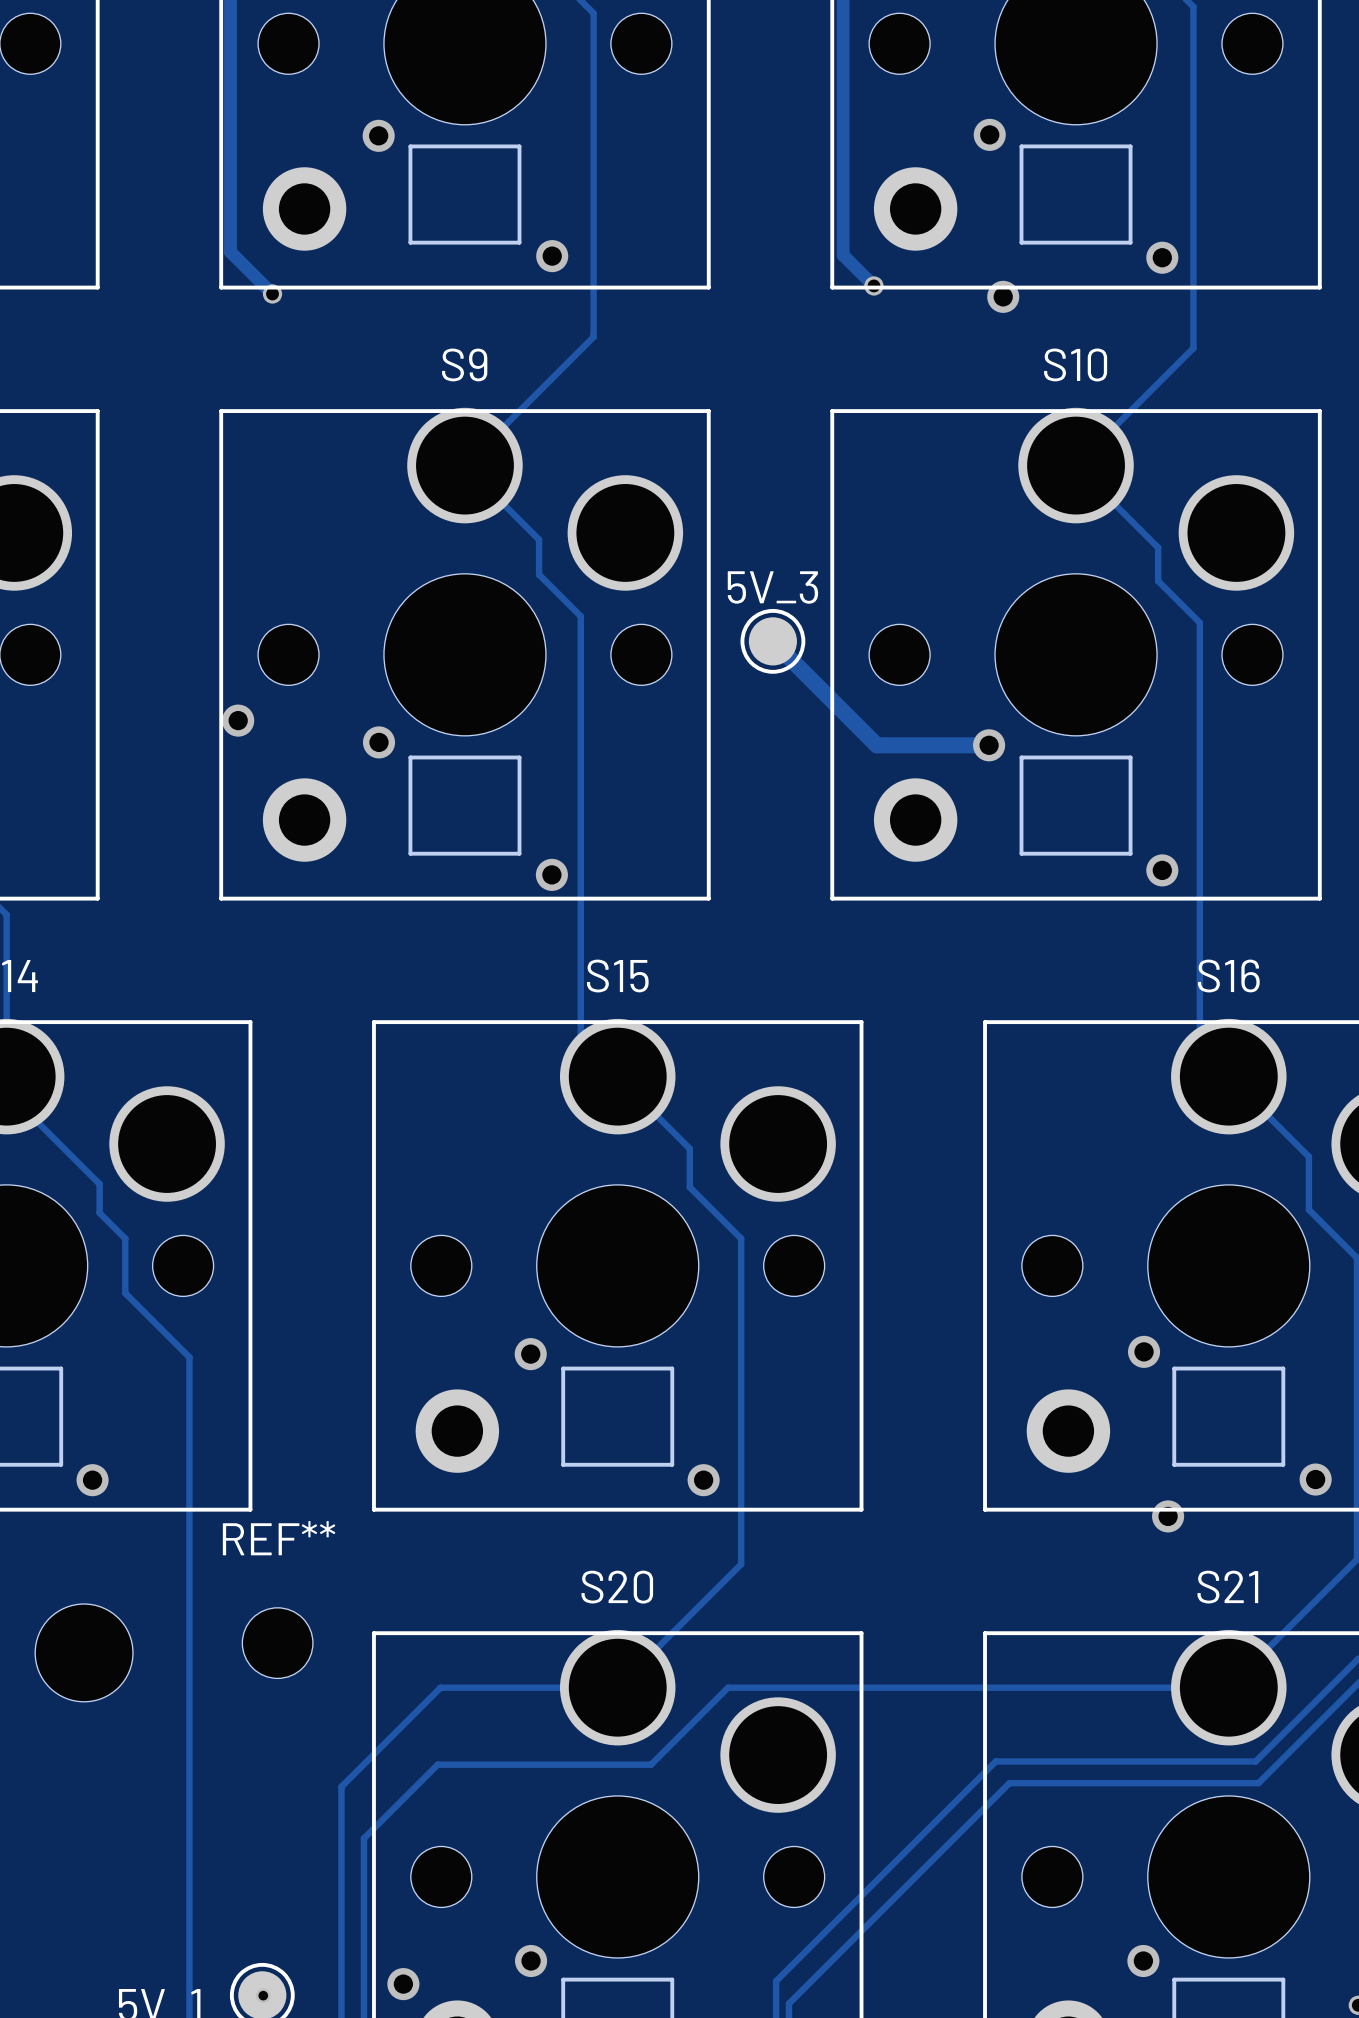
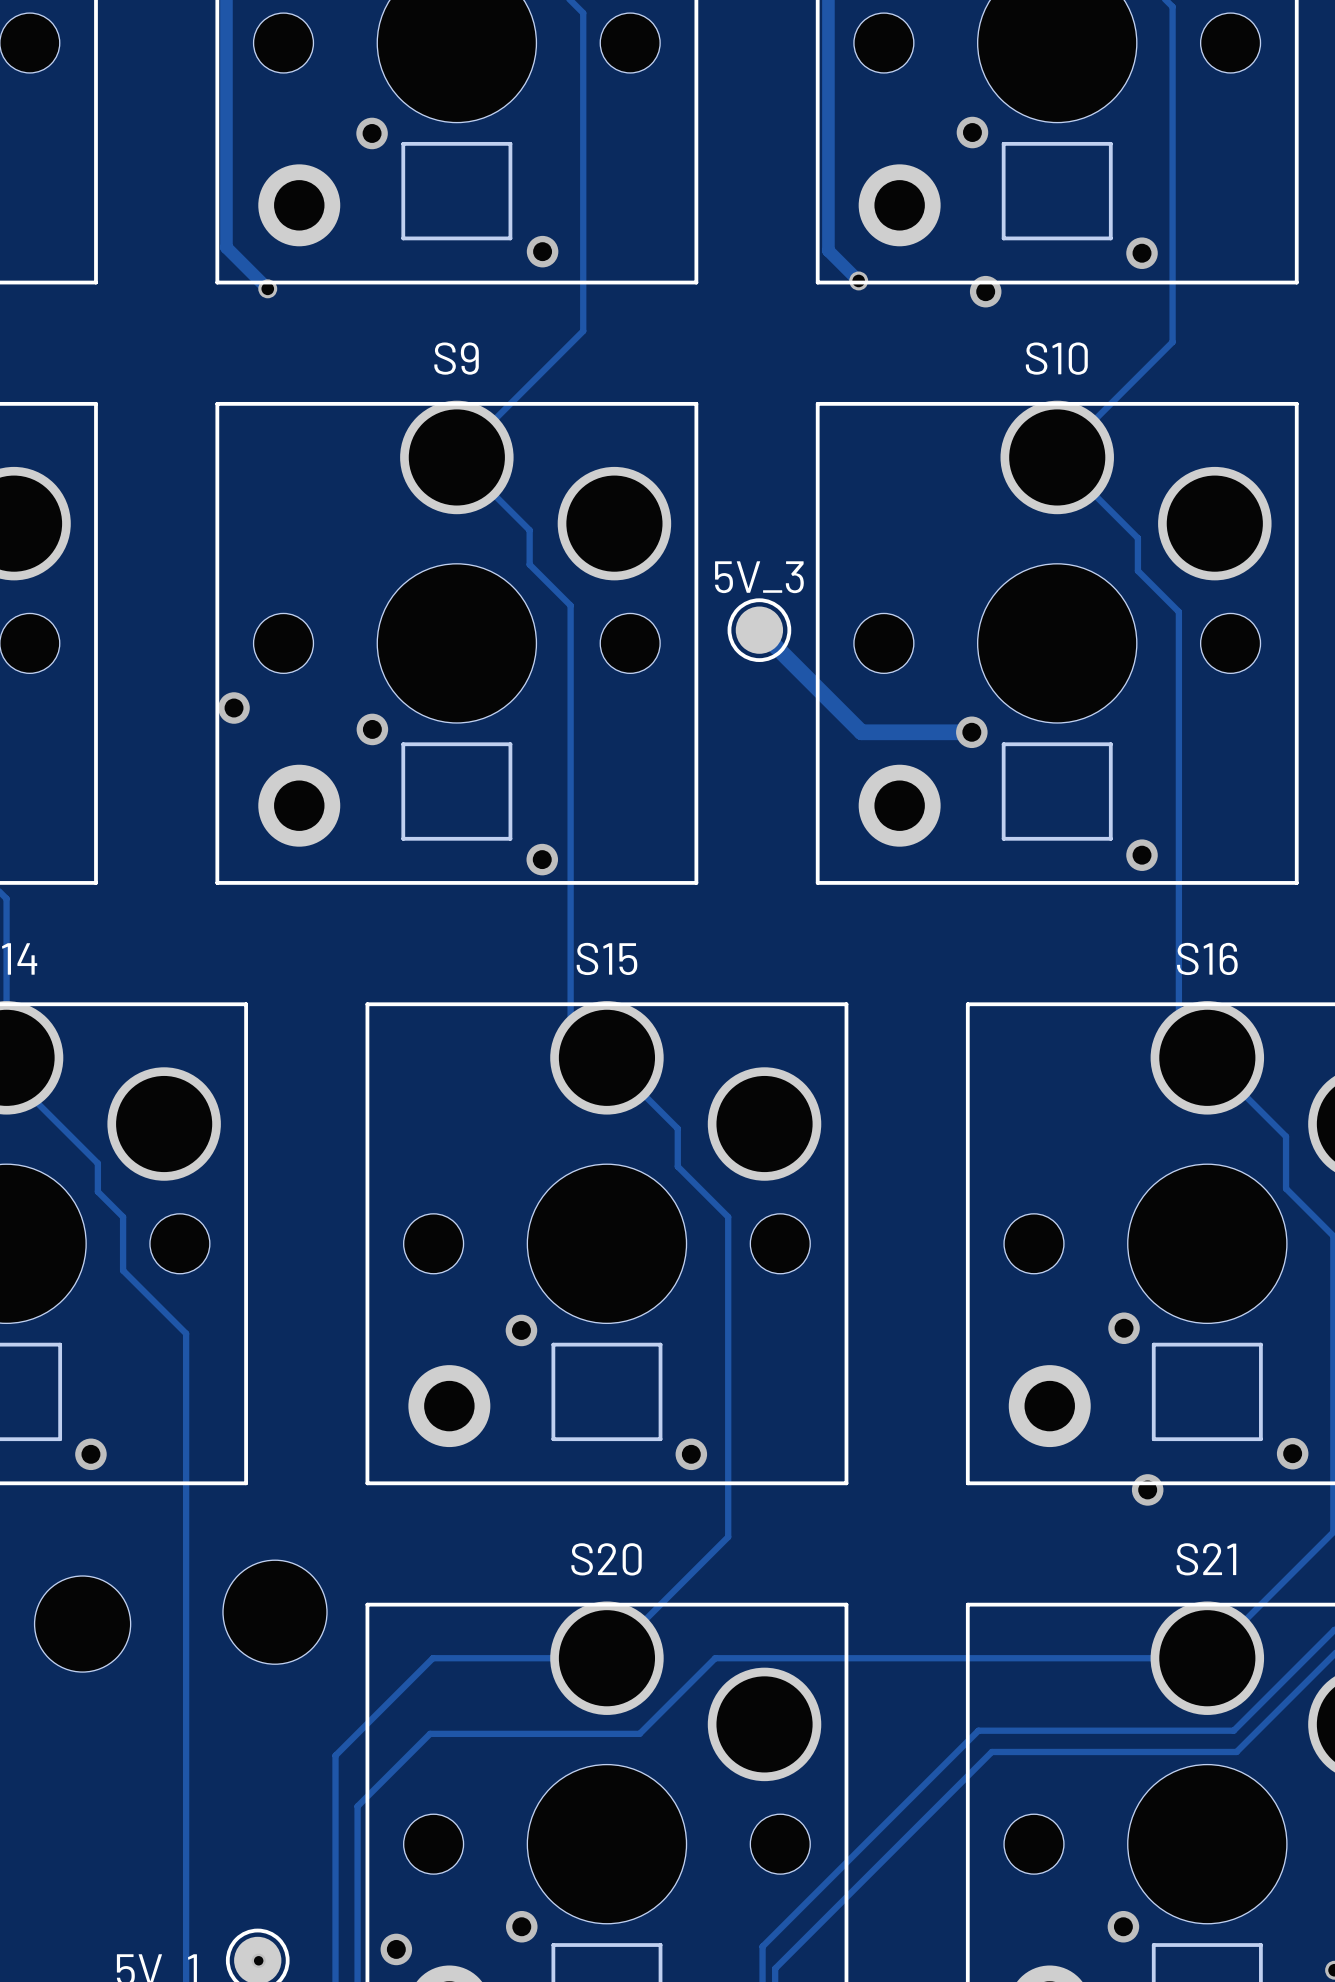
part: none -> (275, 1612)
REF**: (277, 1643) -> none

